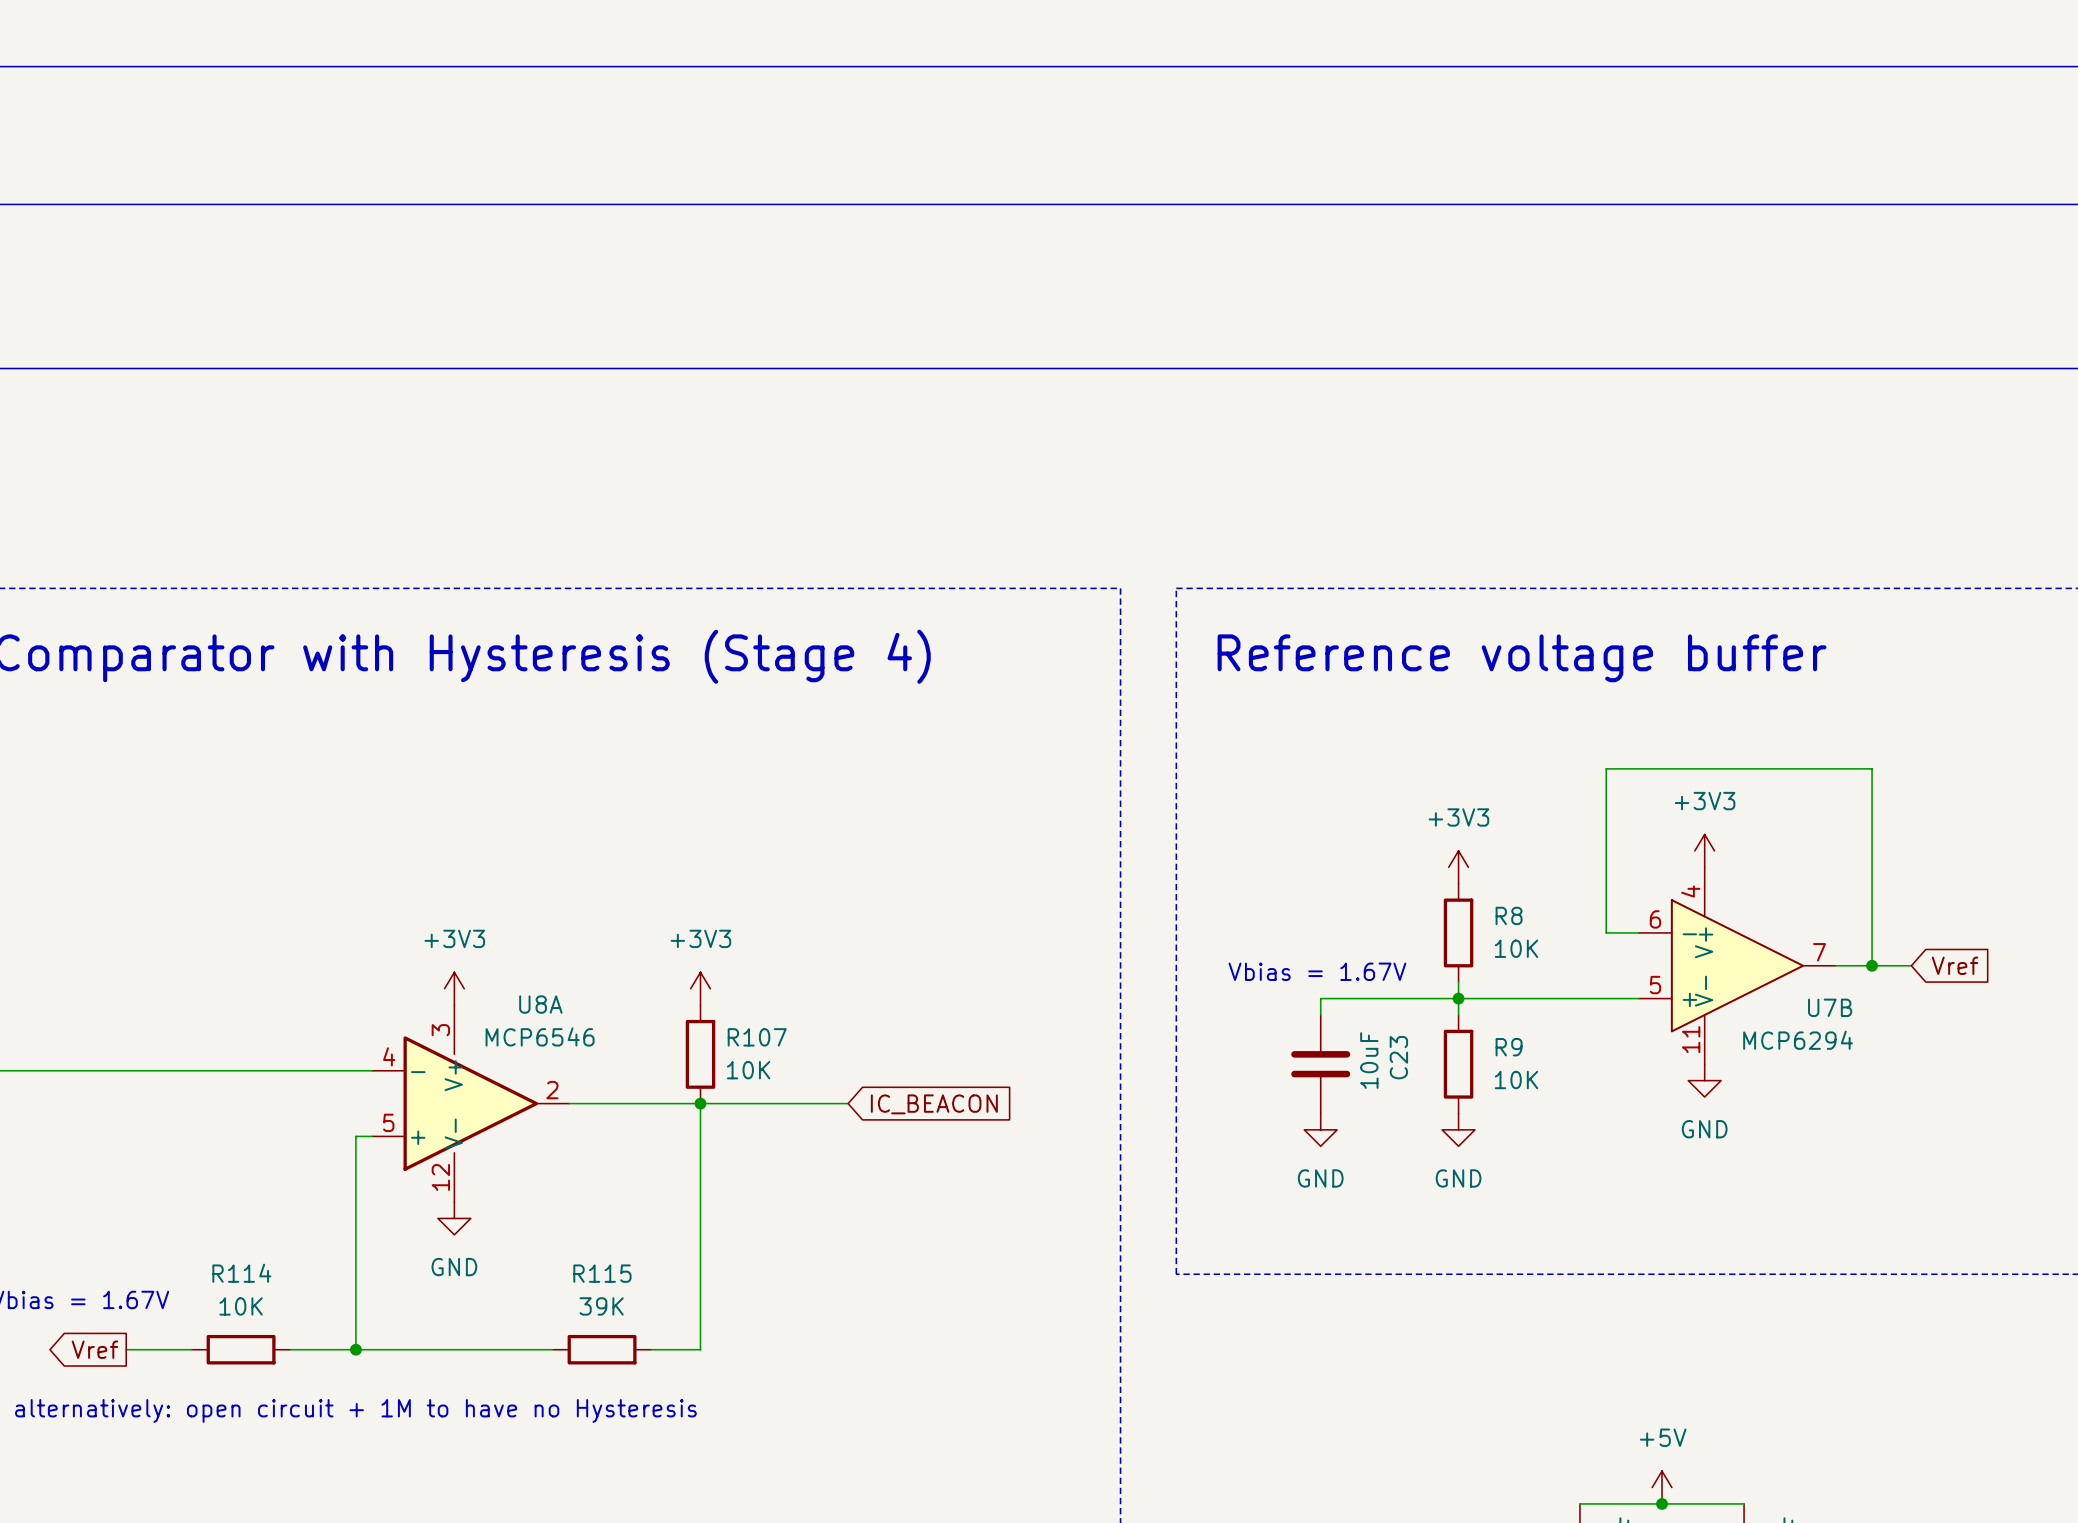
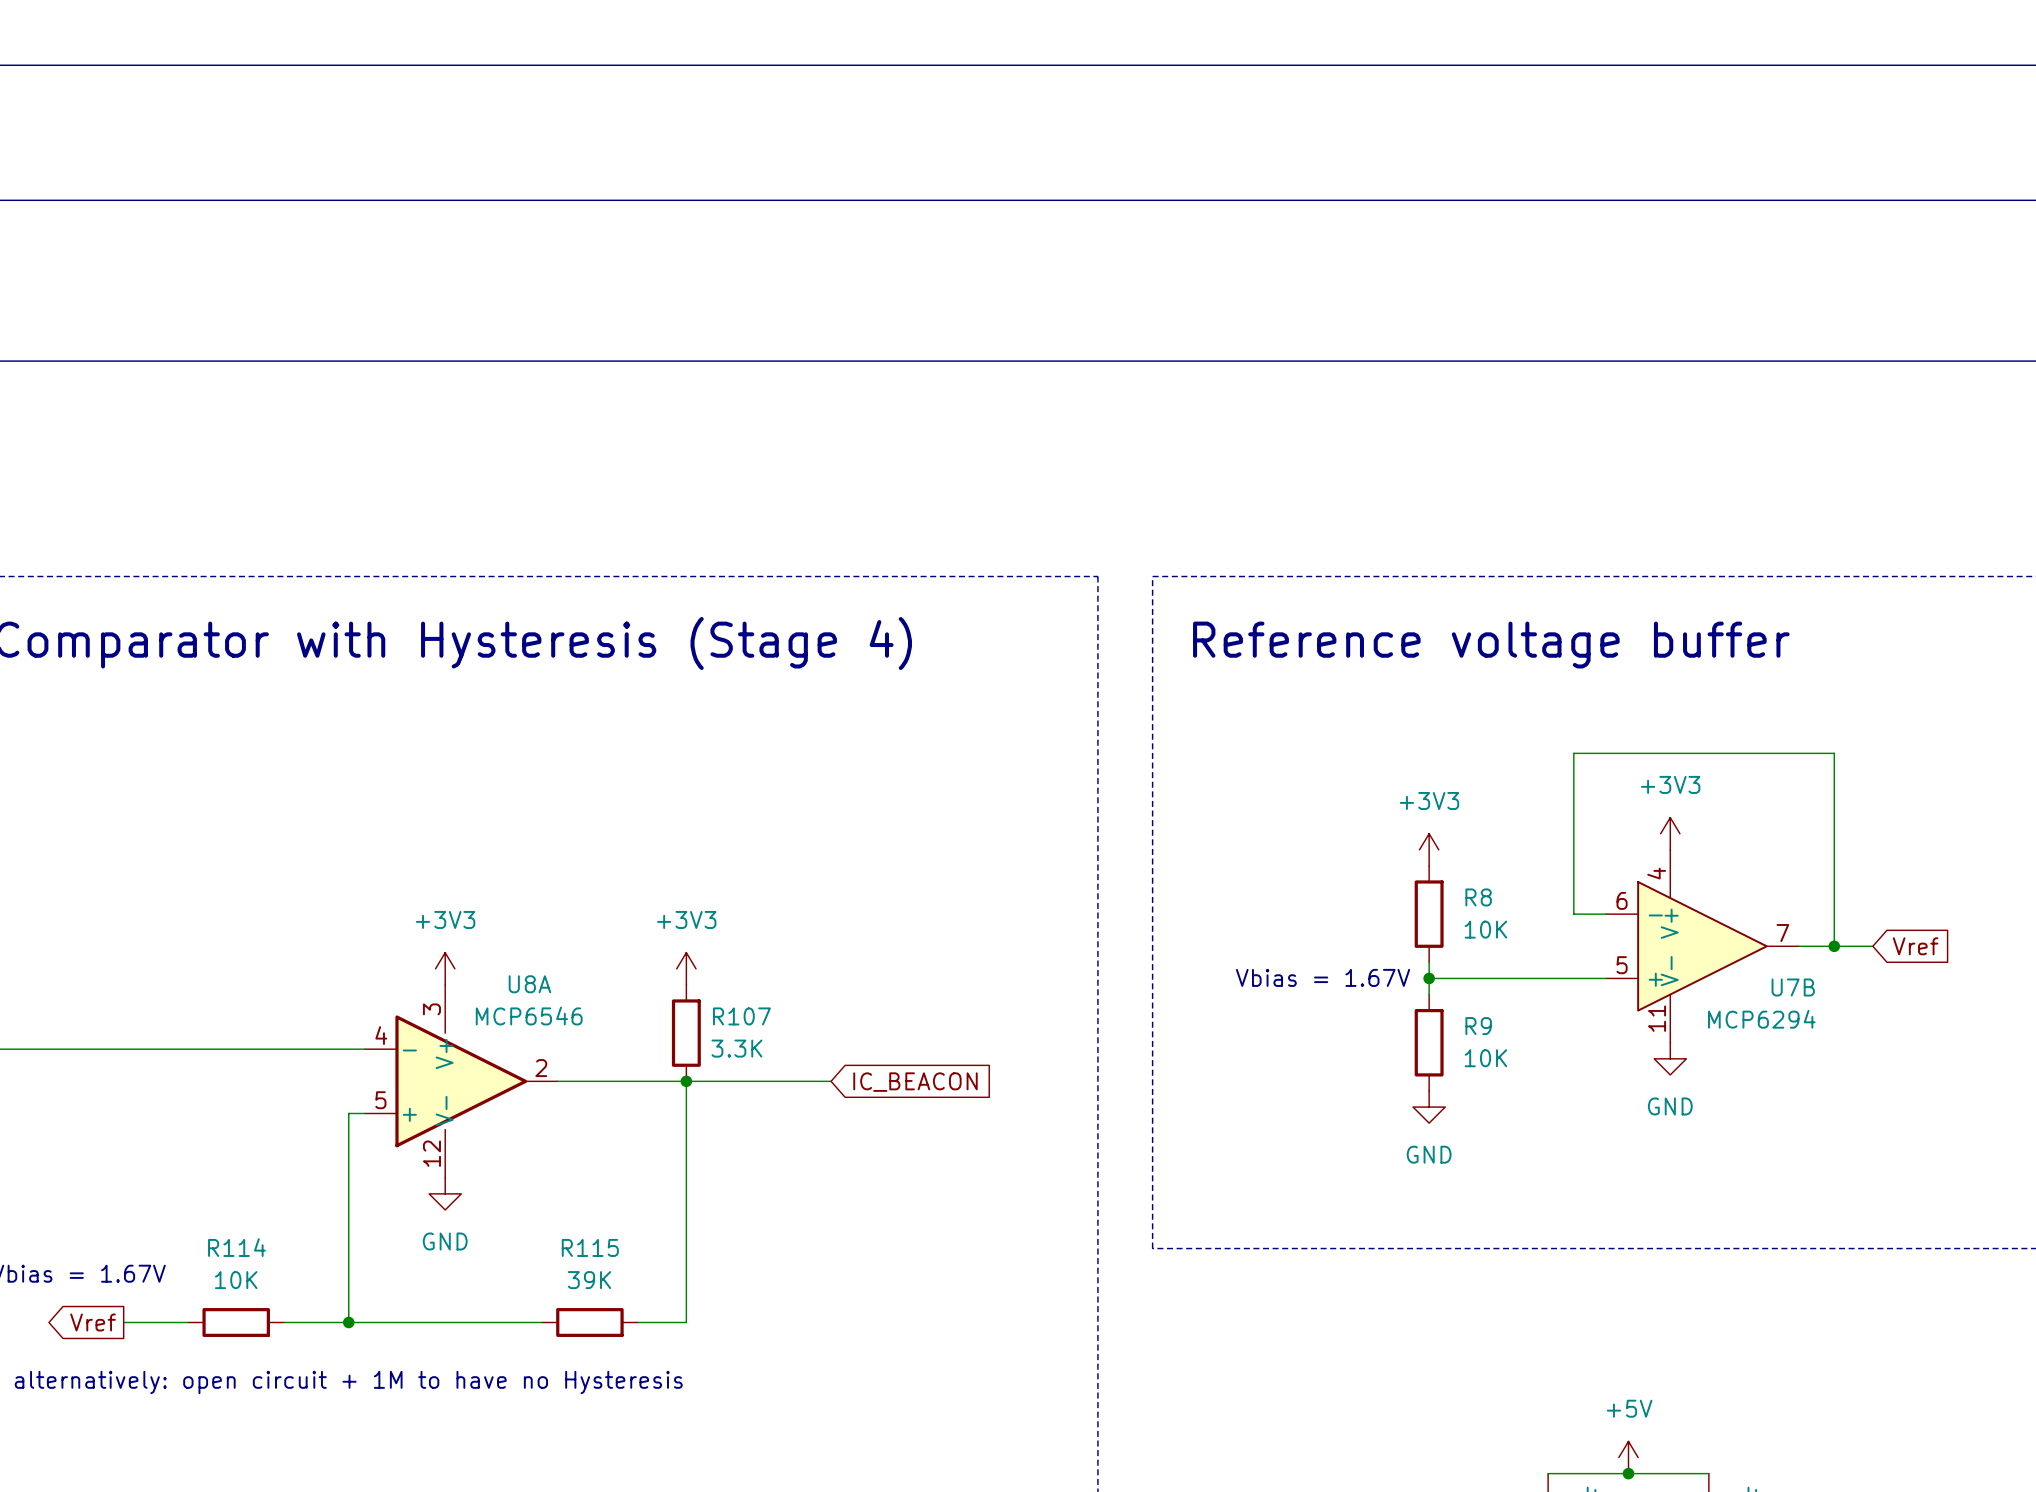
text position: Vbias = 1.67V (1317, 971) -> Vbias = 1.67V (1323, 977)
wire: (1458, 998) (1320, 998) (1320, 1014) -> none
C23: 10uF (1320, 1064) -> none
R107 value: 10K (748, 1070) -> 3.3K (736, 1048)
power symbol: GND (1320, 1129) -> none

